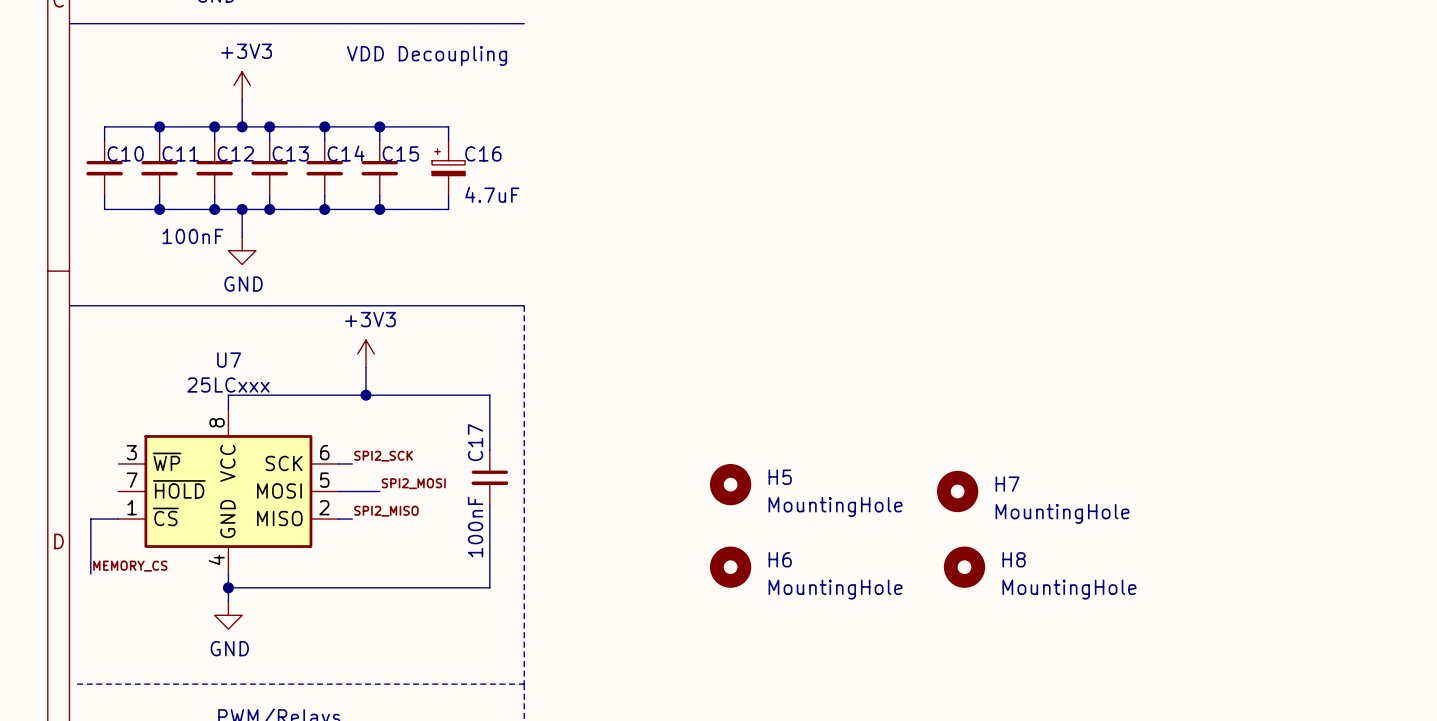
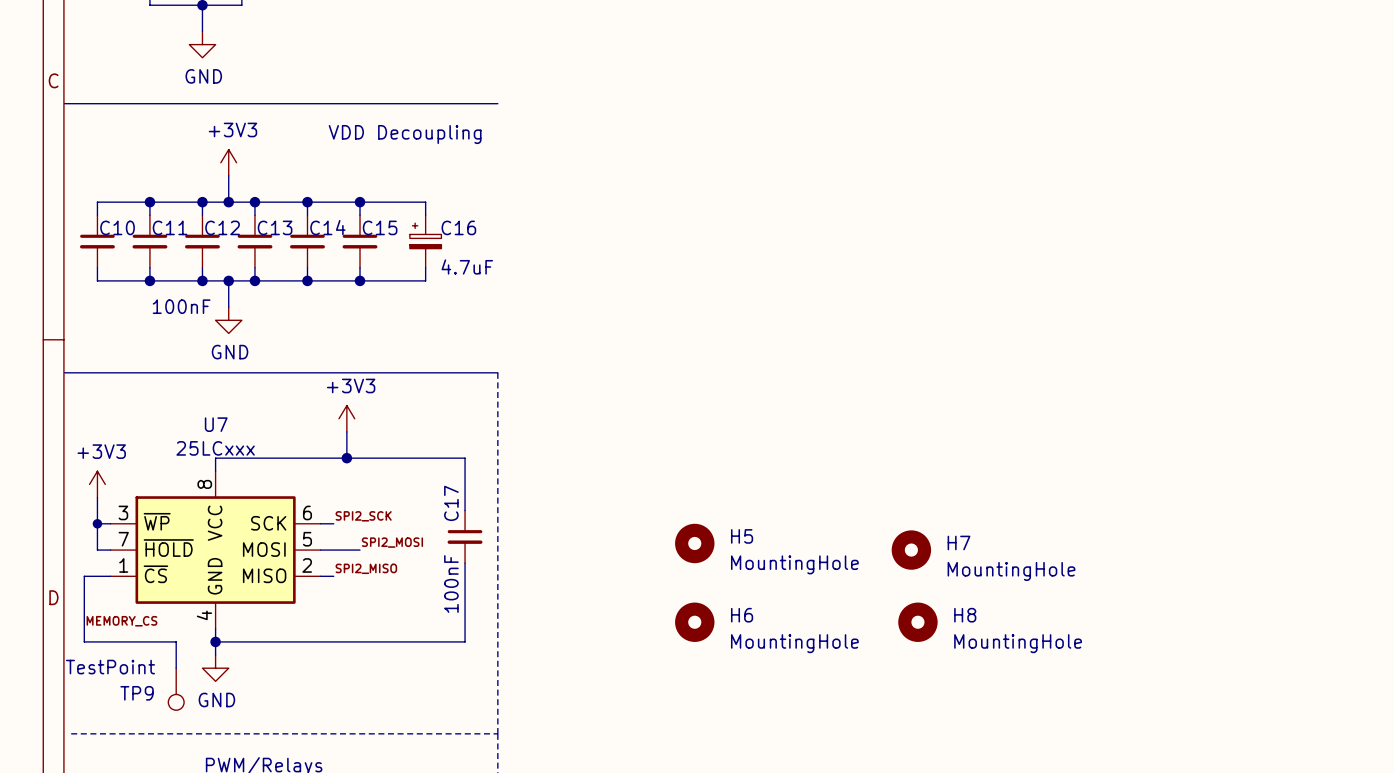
power symbol: none -> +3V3 (97, 484)
wire: none -> (97, 497) (97, 550) (110, 550)
wire: none -> (97, 523) (110, 523)
junction: none -> (97, 523)
wire: none -> (84, 628) (84, 641) (176, 641) (176, 668)
TP9: none -> TestPoint (176, 689)

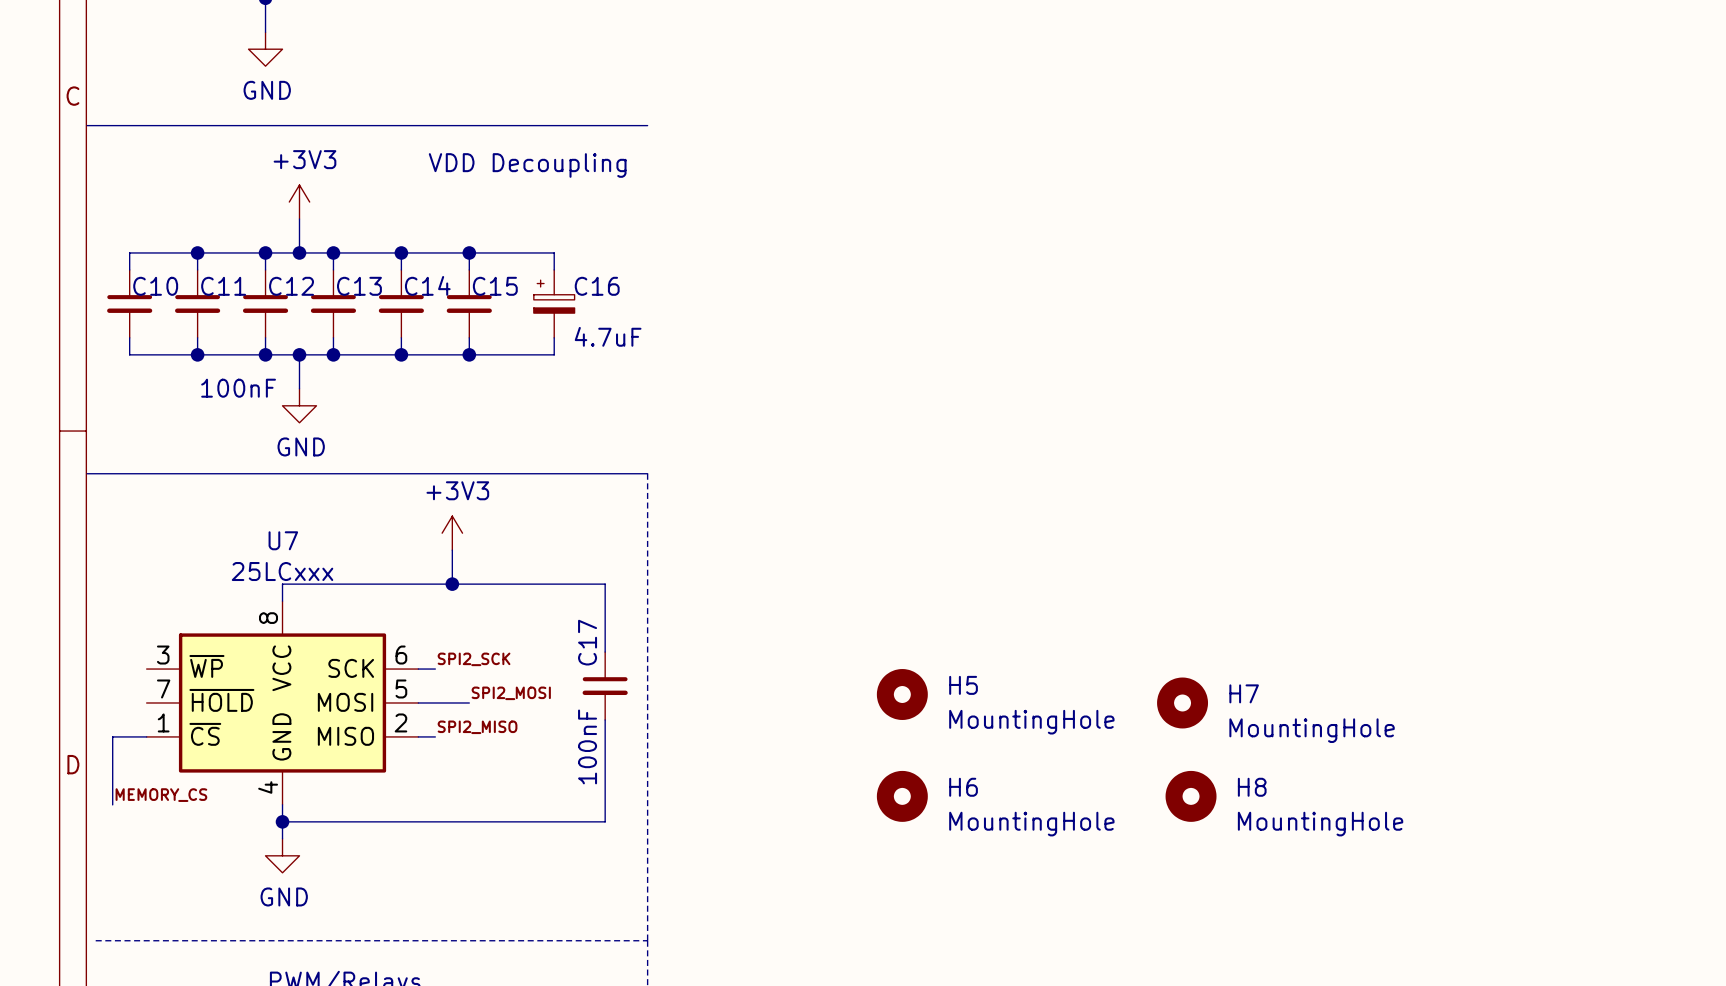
power symbol: +3V3 (97, 484) -> none
wire: (97, 497) (97, 550) (110, 550) -> none
wire: (97, 523) (110, 523) -> none
junction: (97, 523) -> none
wire: (84, 628) (84, 641) (176, 641) (176, 668) -> none
TP9: TestPoint (176, 689) -> none

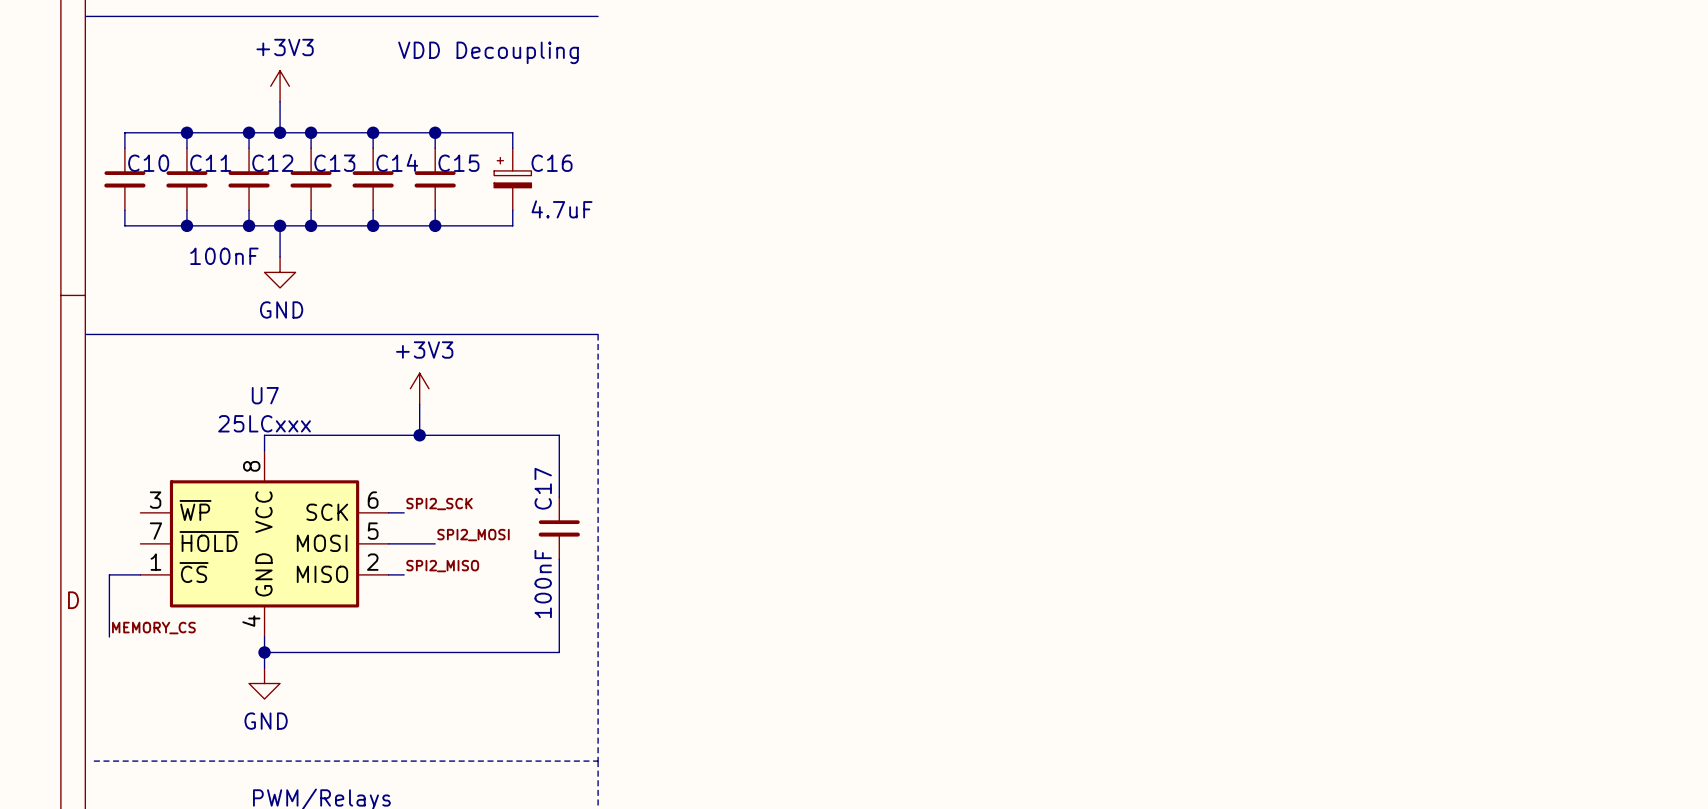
H5: MountingHole (902, 694) -> none
H7: MountingHole (1182, 702) -> none
H6: MountingHole (902, 796) -> none
H8: MountingHole (1191, 796) -> none

